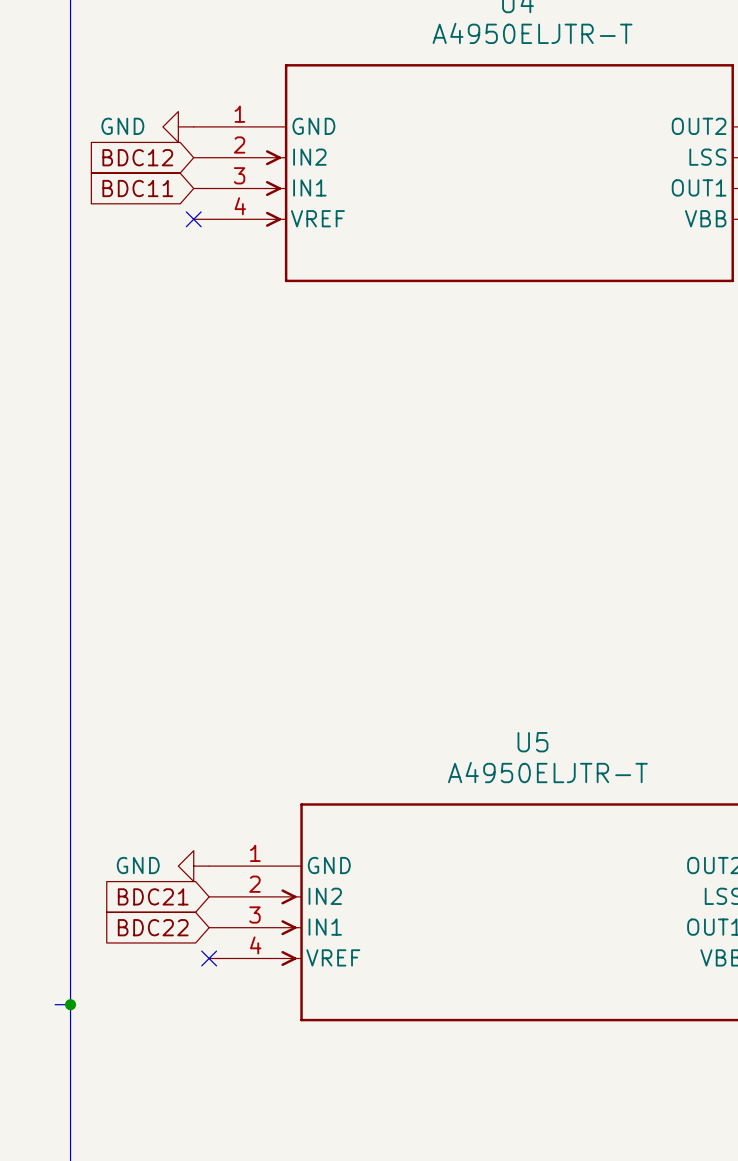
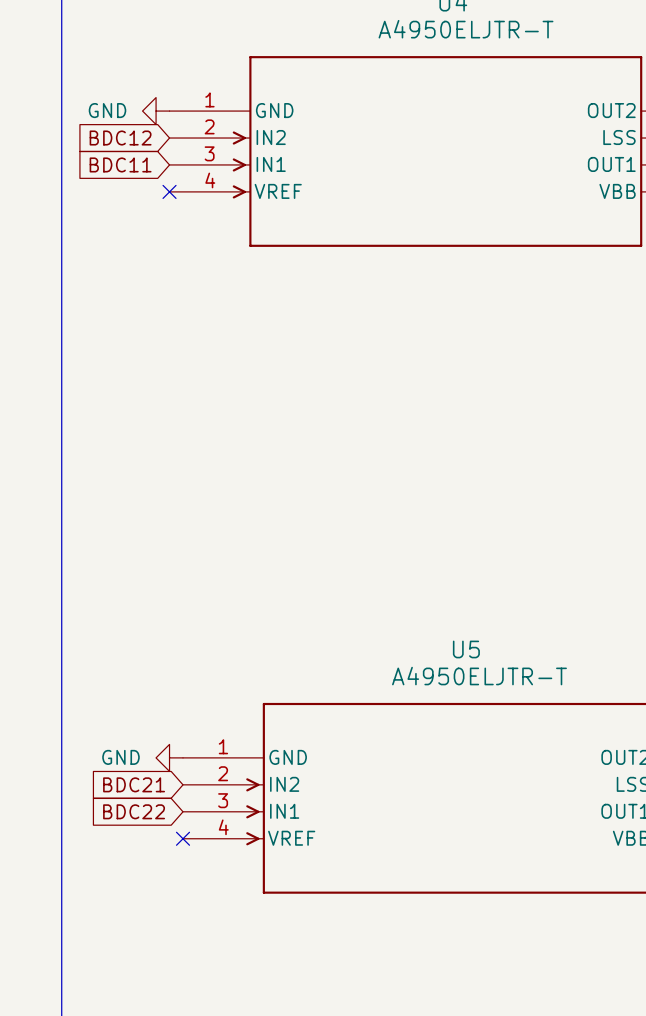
bus: (55, 1004) (70, 1004) -> none
junction: (70, 1004) -> none

